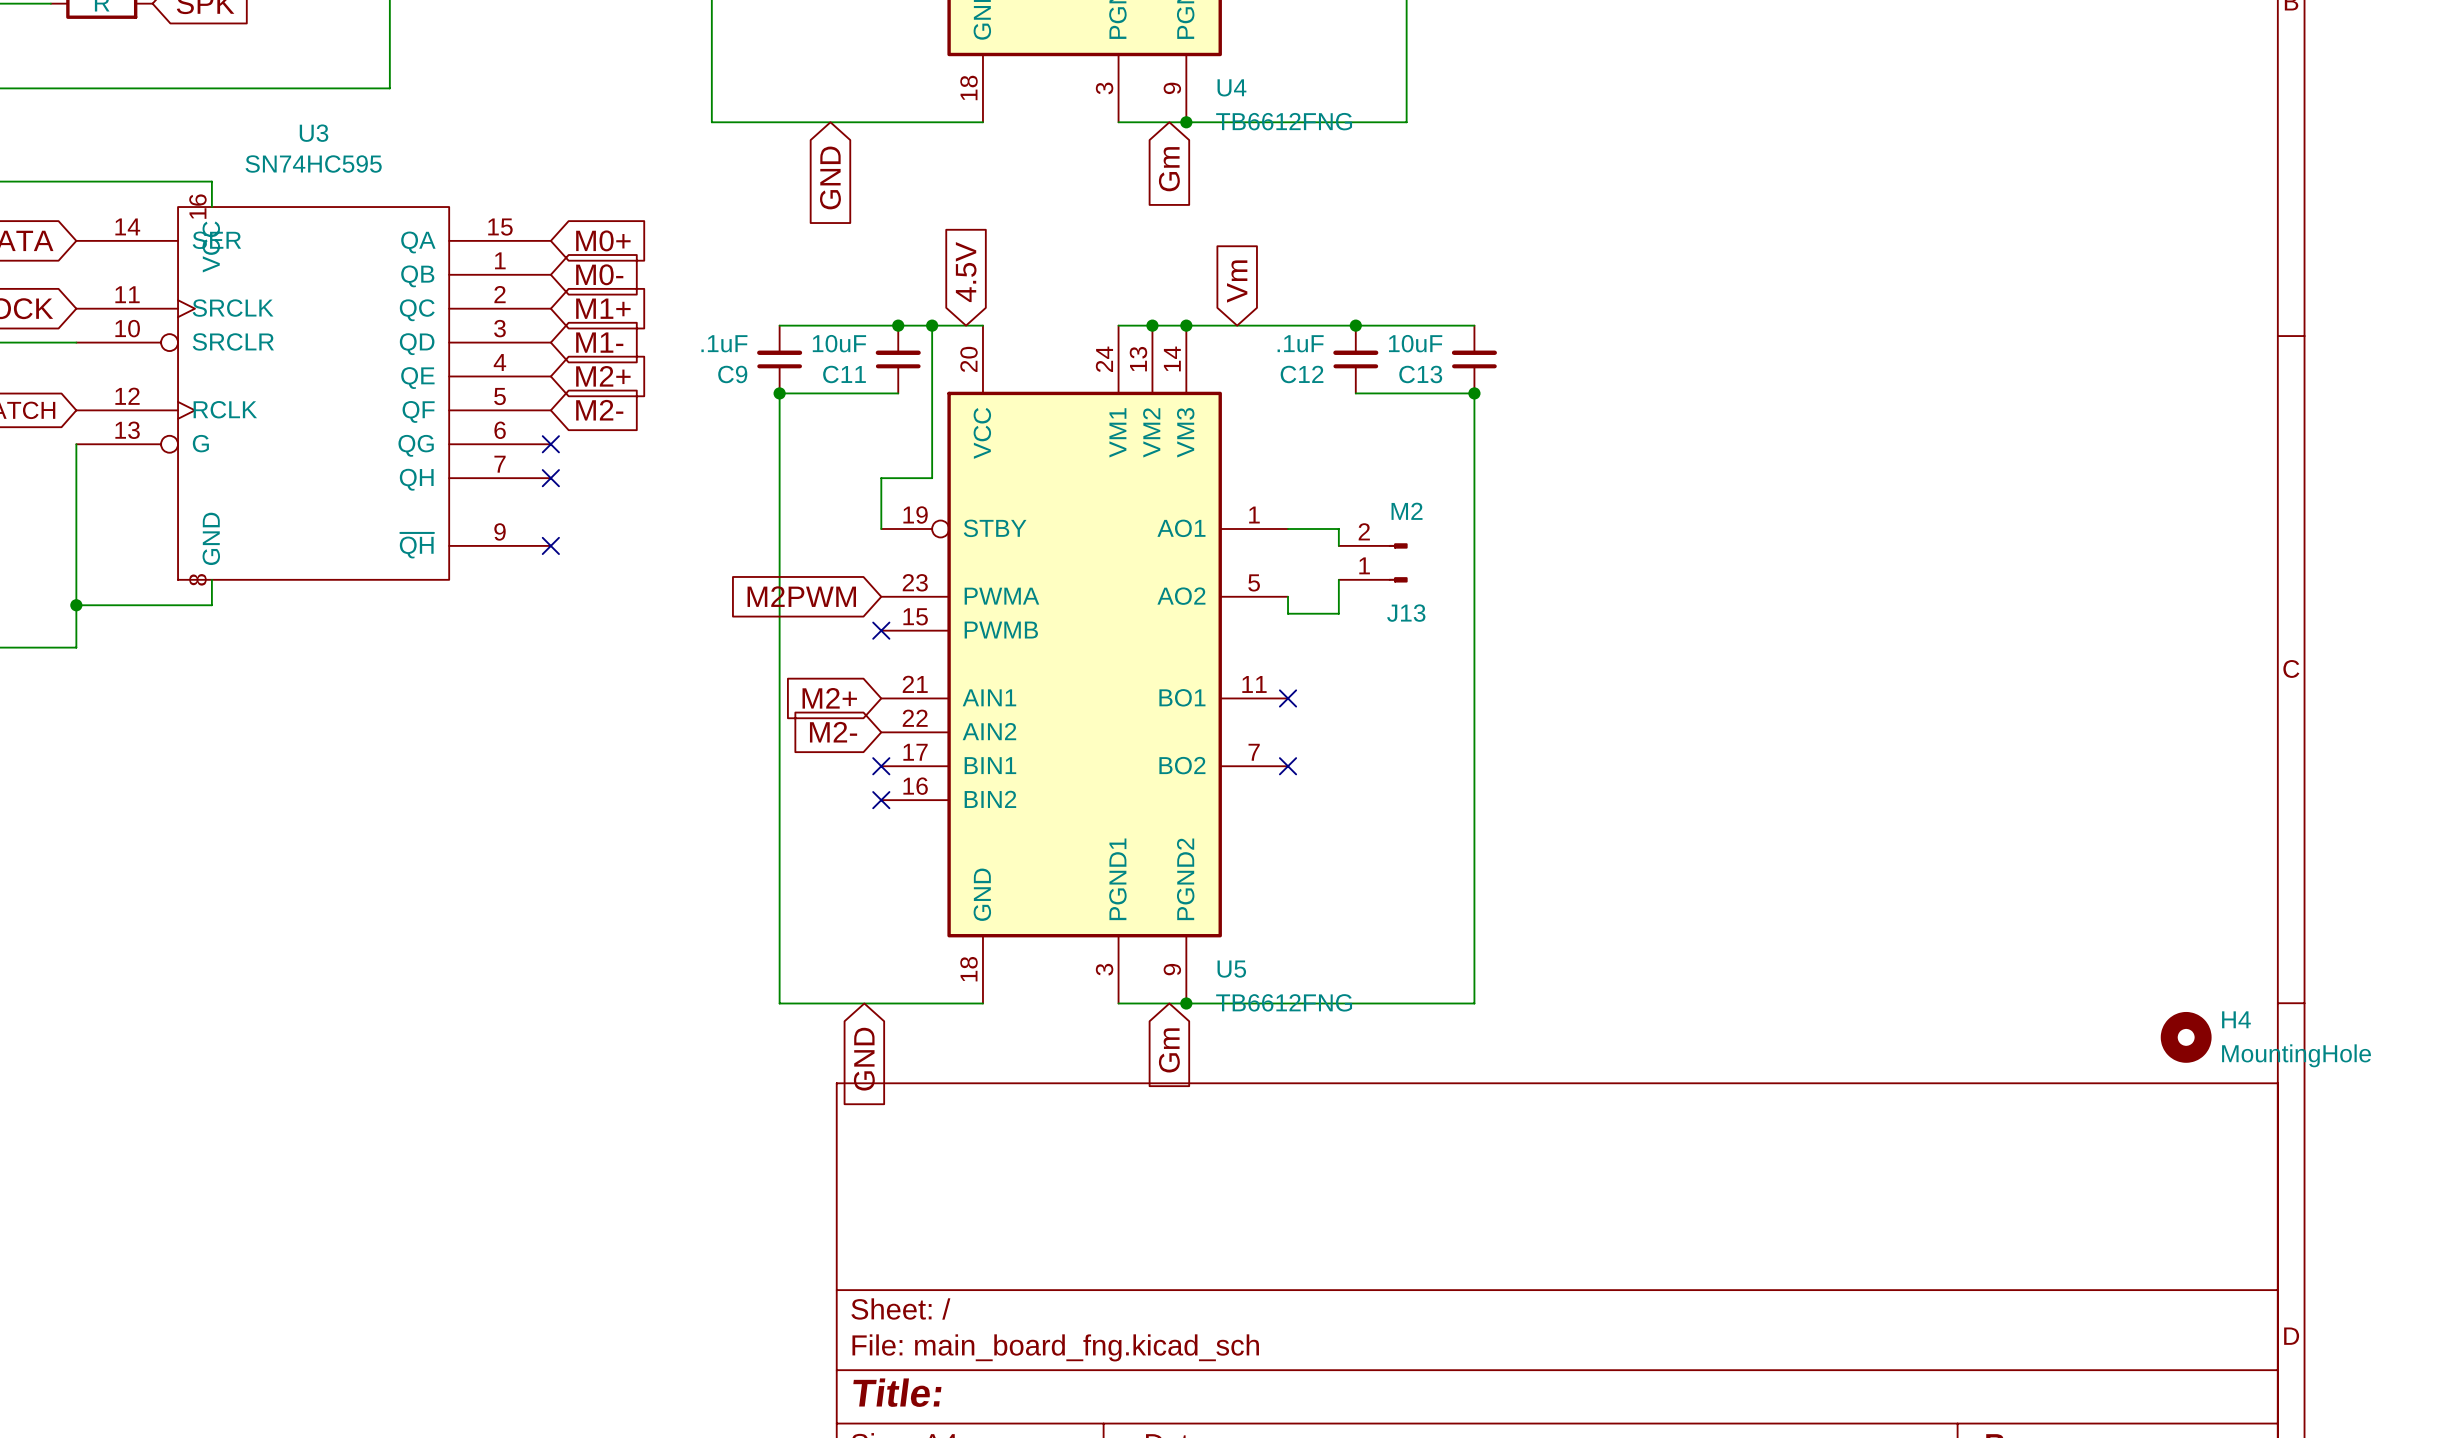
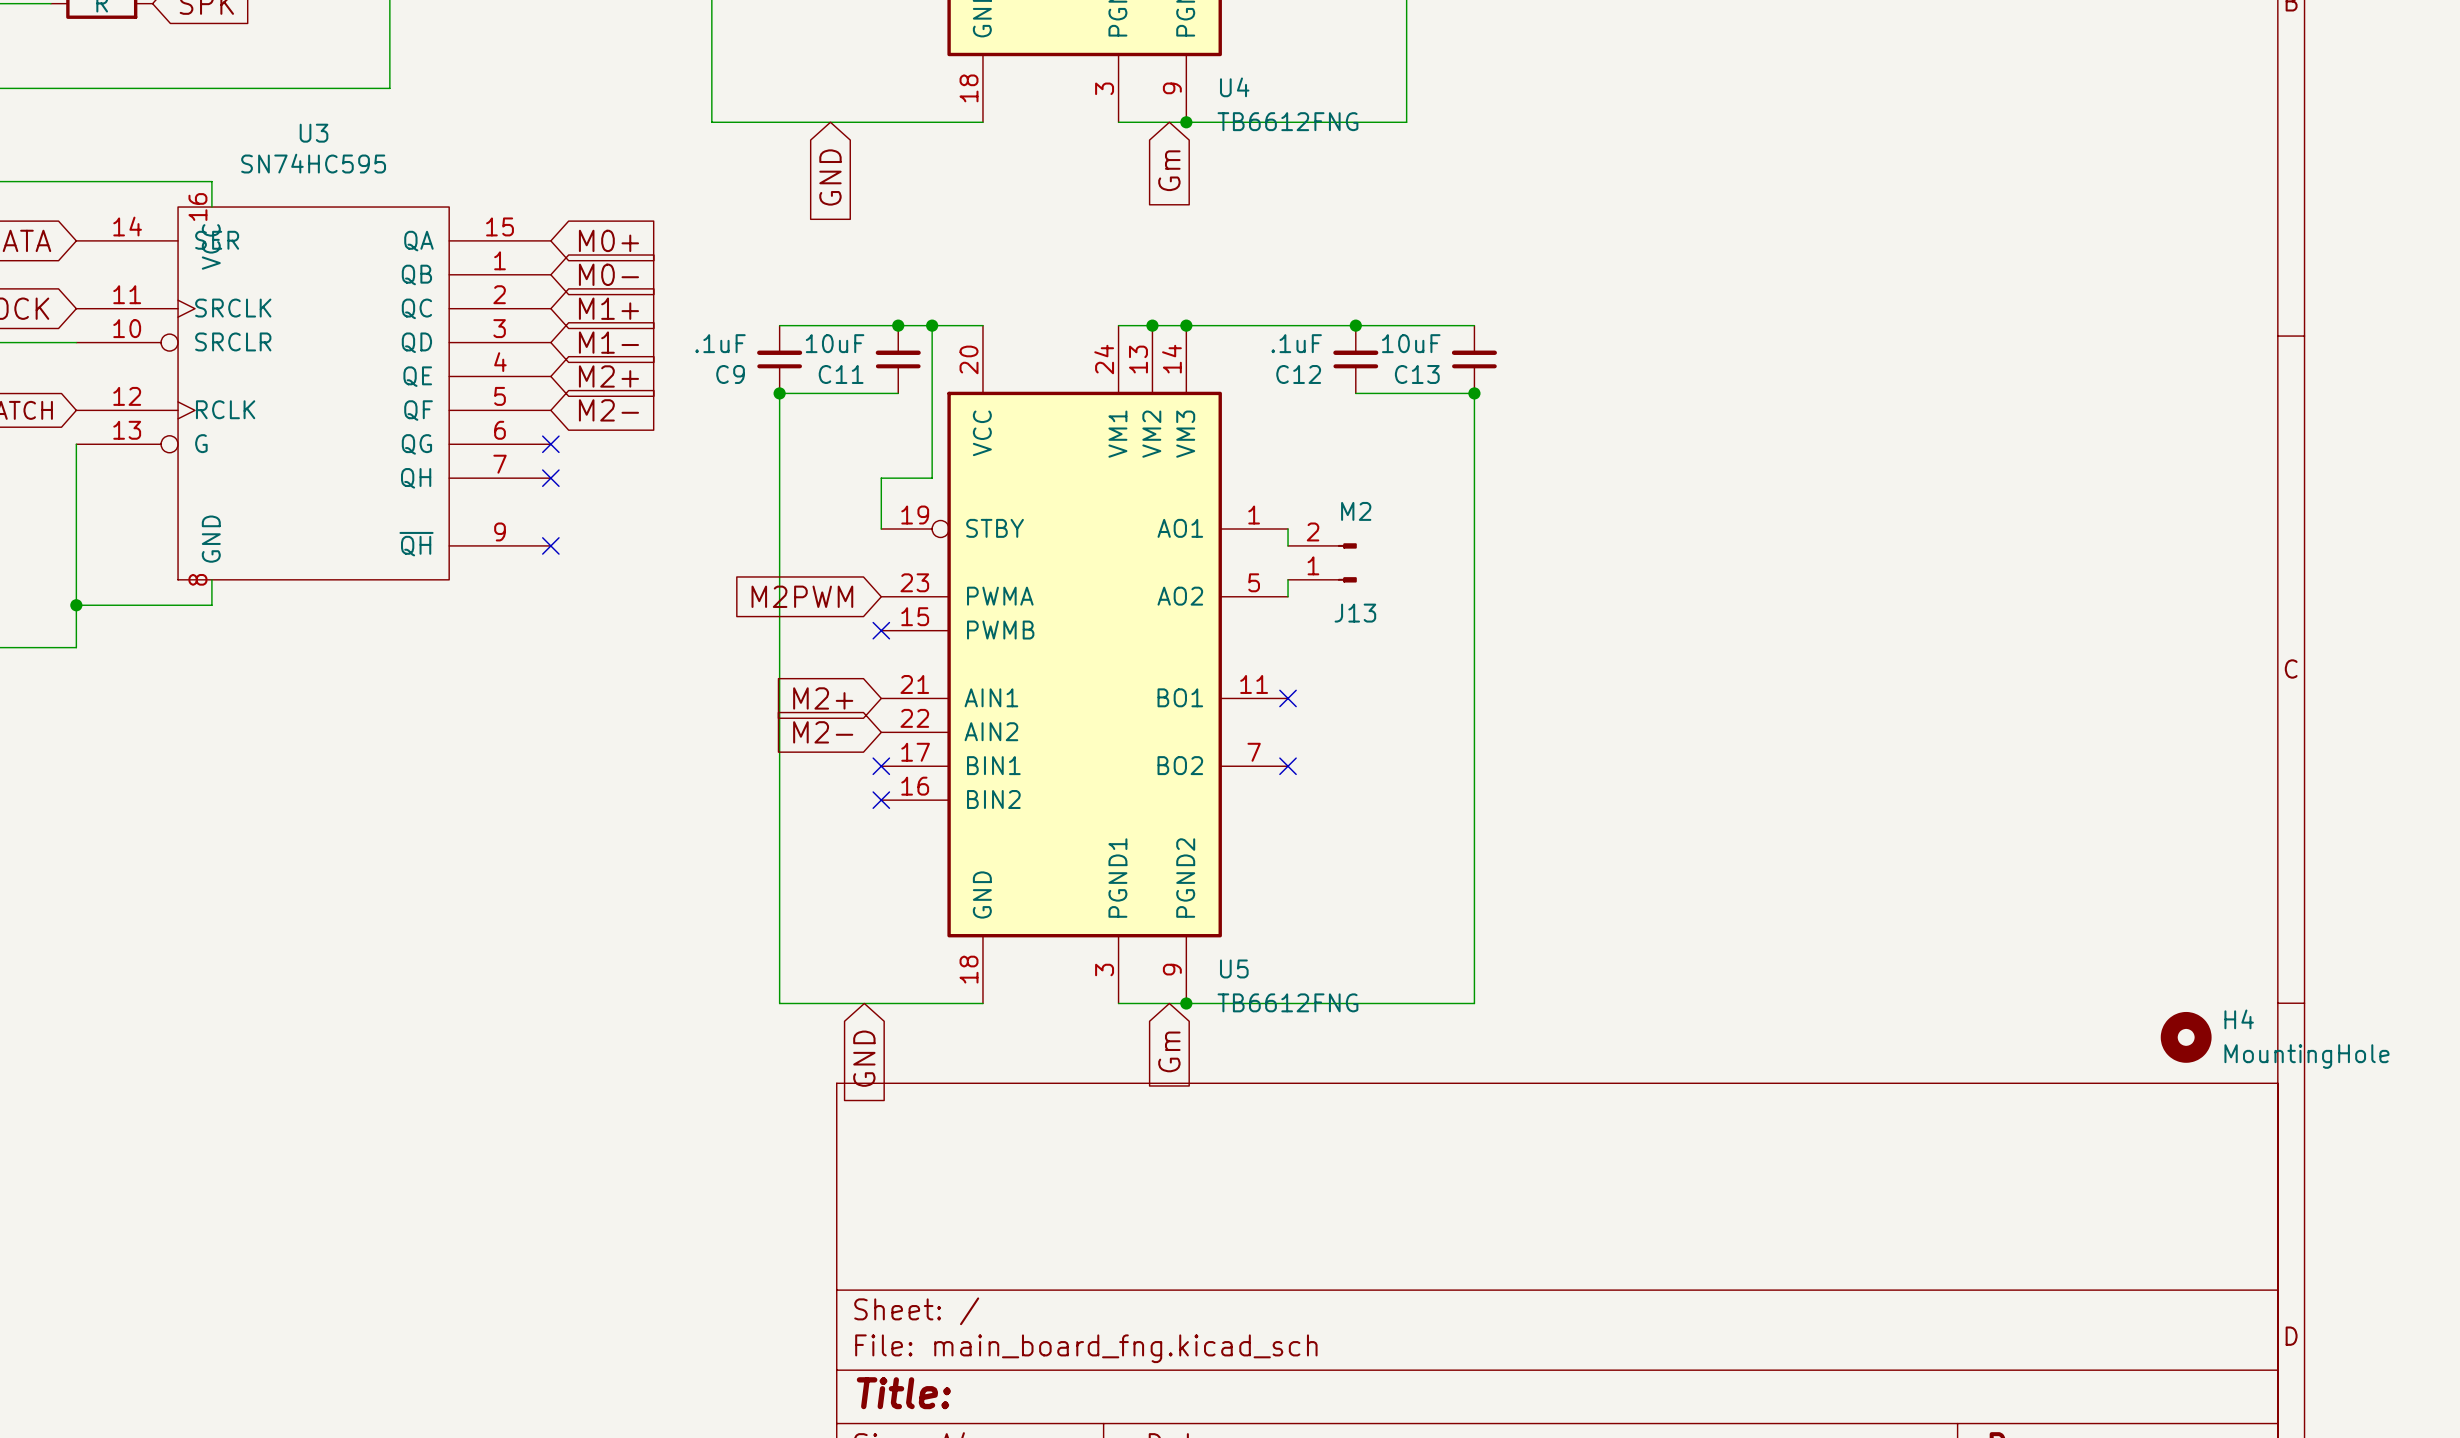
global label: 4.5V (966, 272) -> none
global label: Vm (1237, 281) -> none
wire: (1288, 528) (1338, 528) (1338, 545) -> (1288, 528) (1288, 545)
J13 position: (1373, 562) -> (1322, 562)
wire: (1338, 579) (1338, 613) (1288, 613) (1288, 596) -> (1288, 579) (1288, 596)

